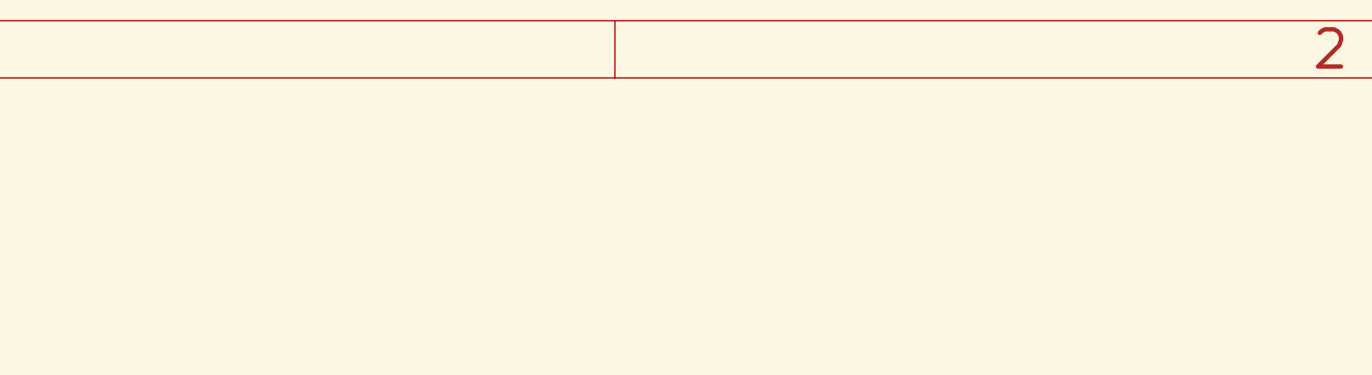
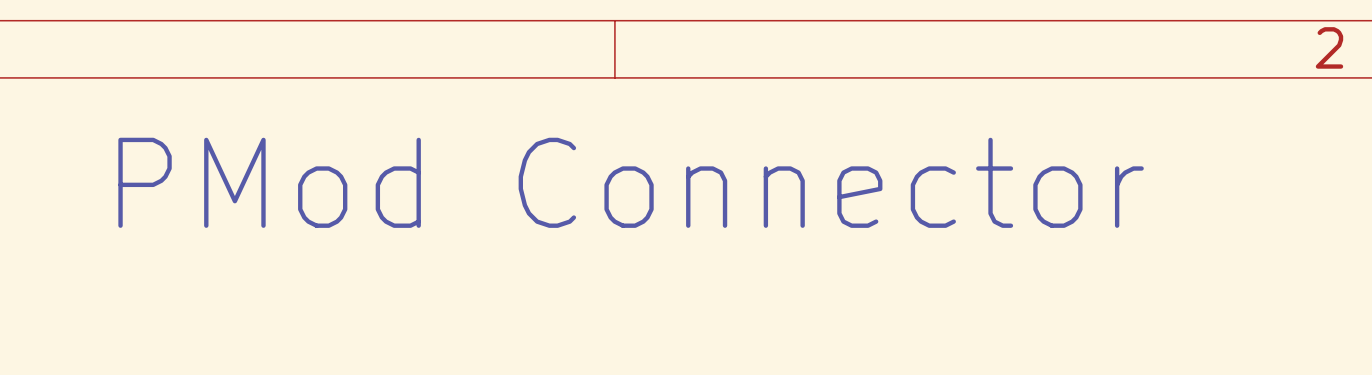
text: none -> PMod Connector (631, 182)

